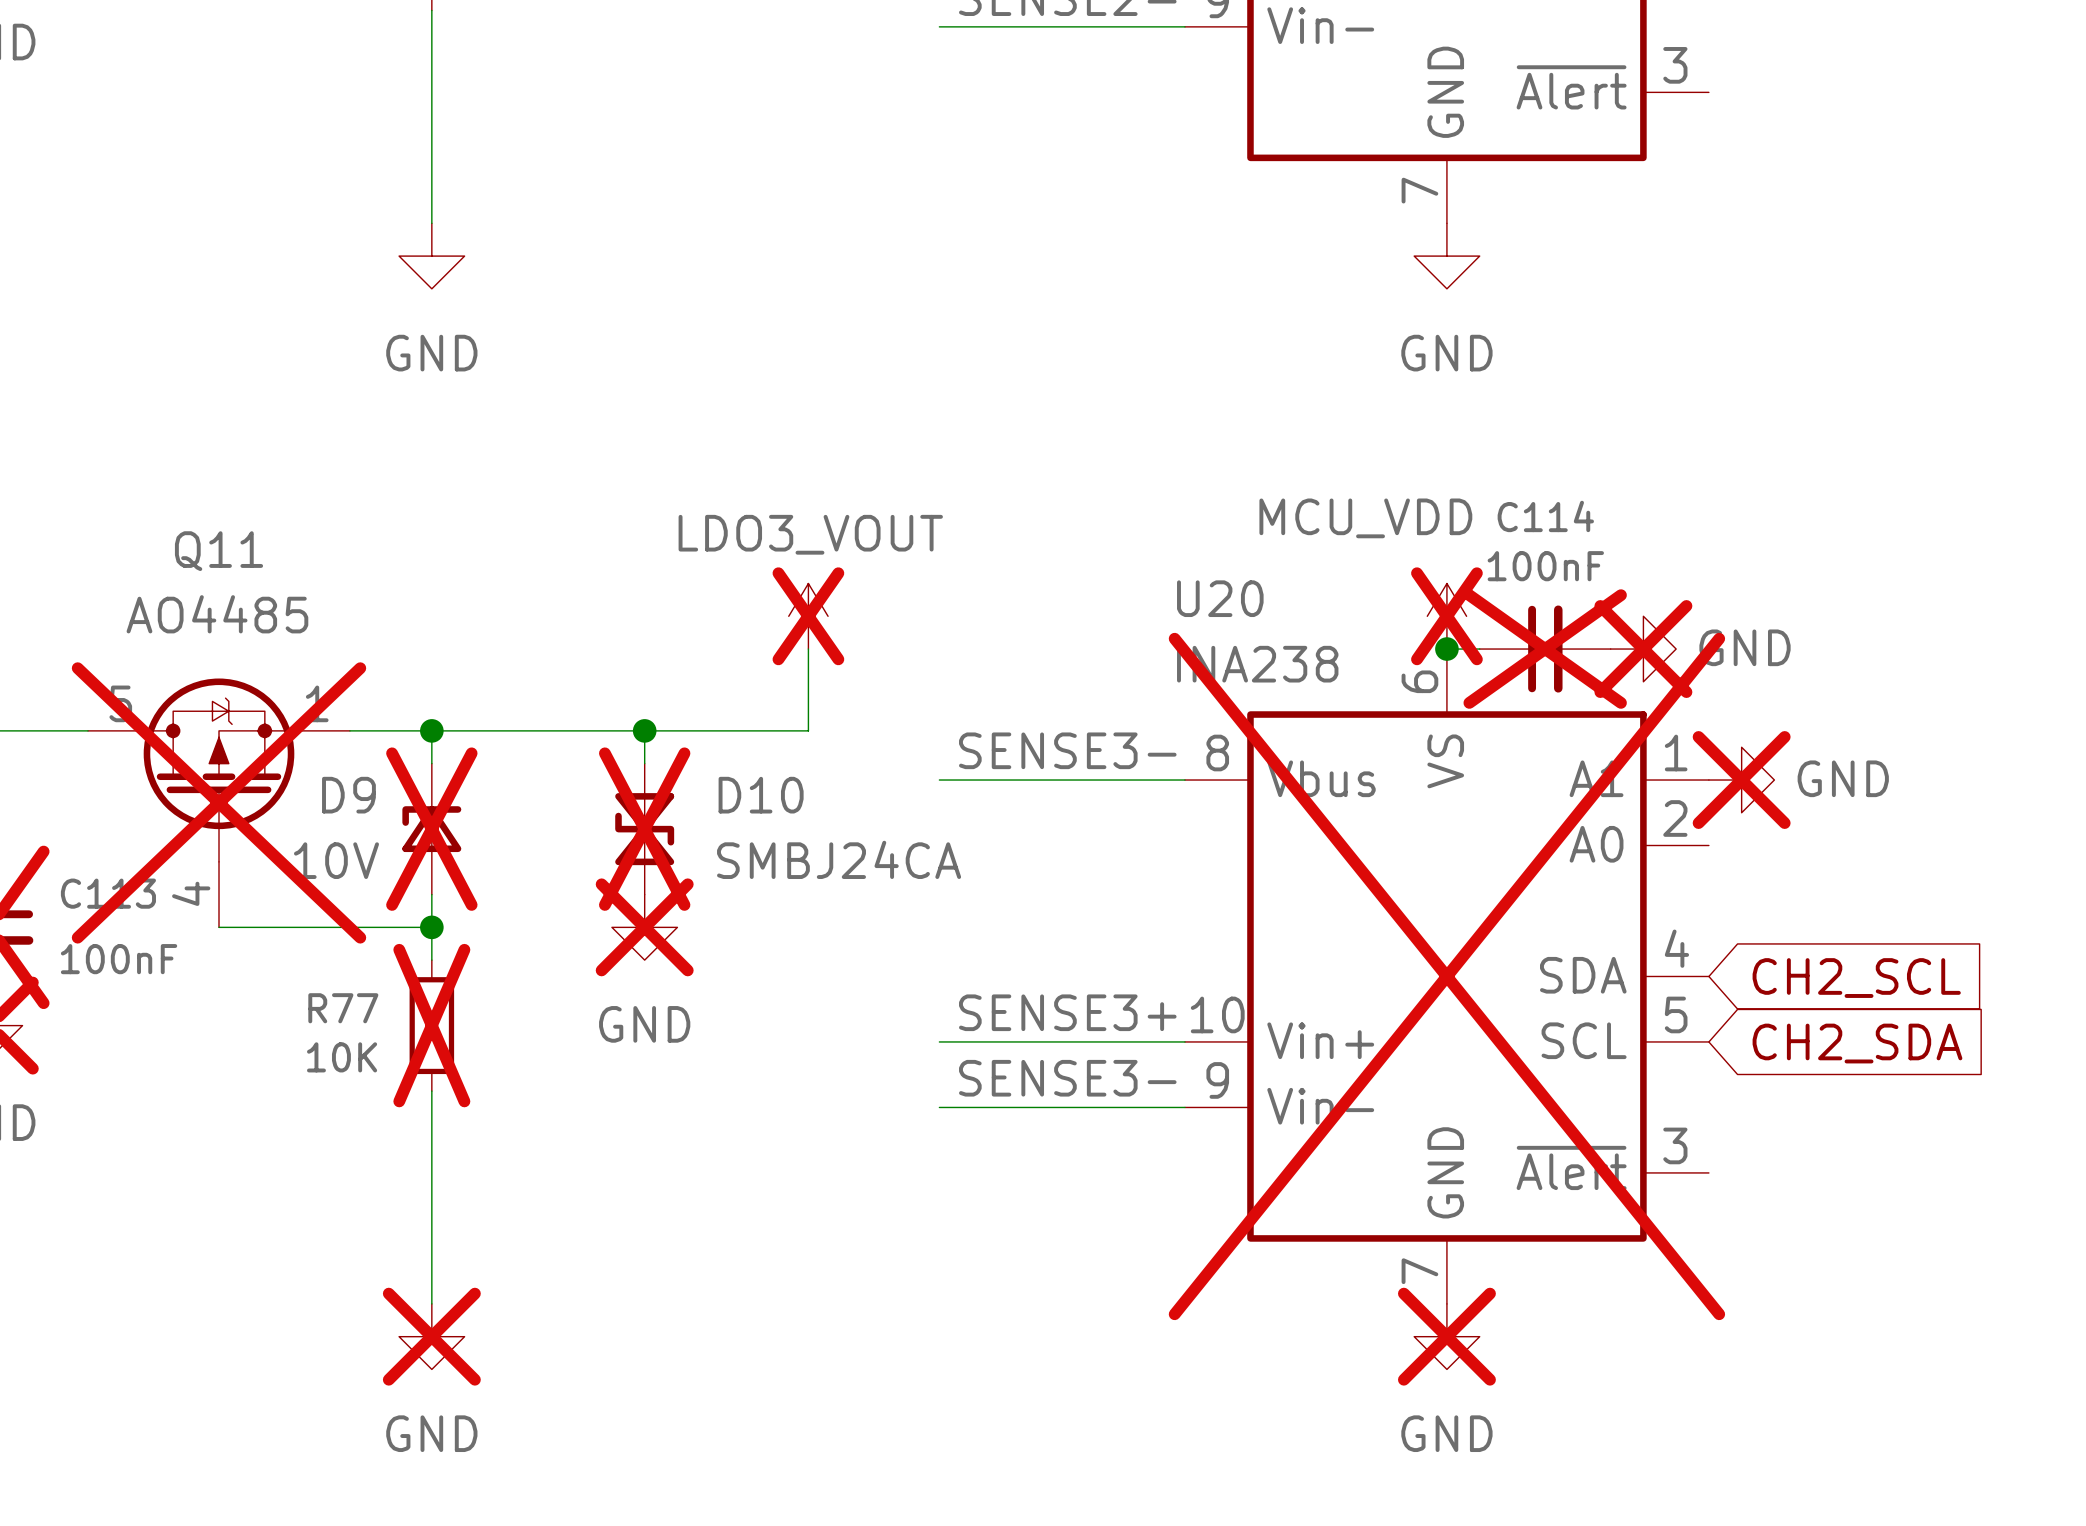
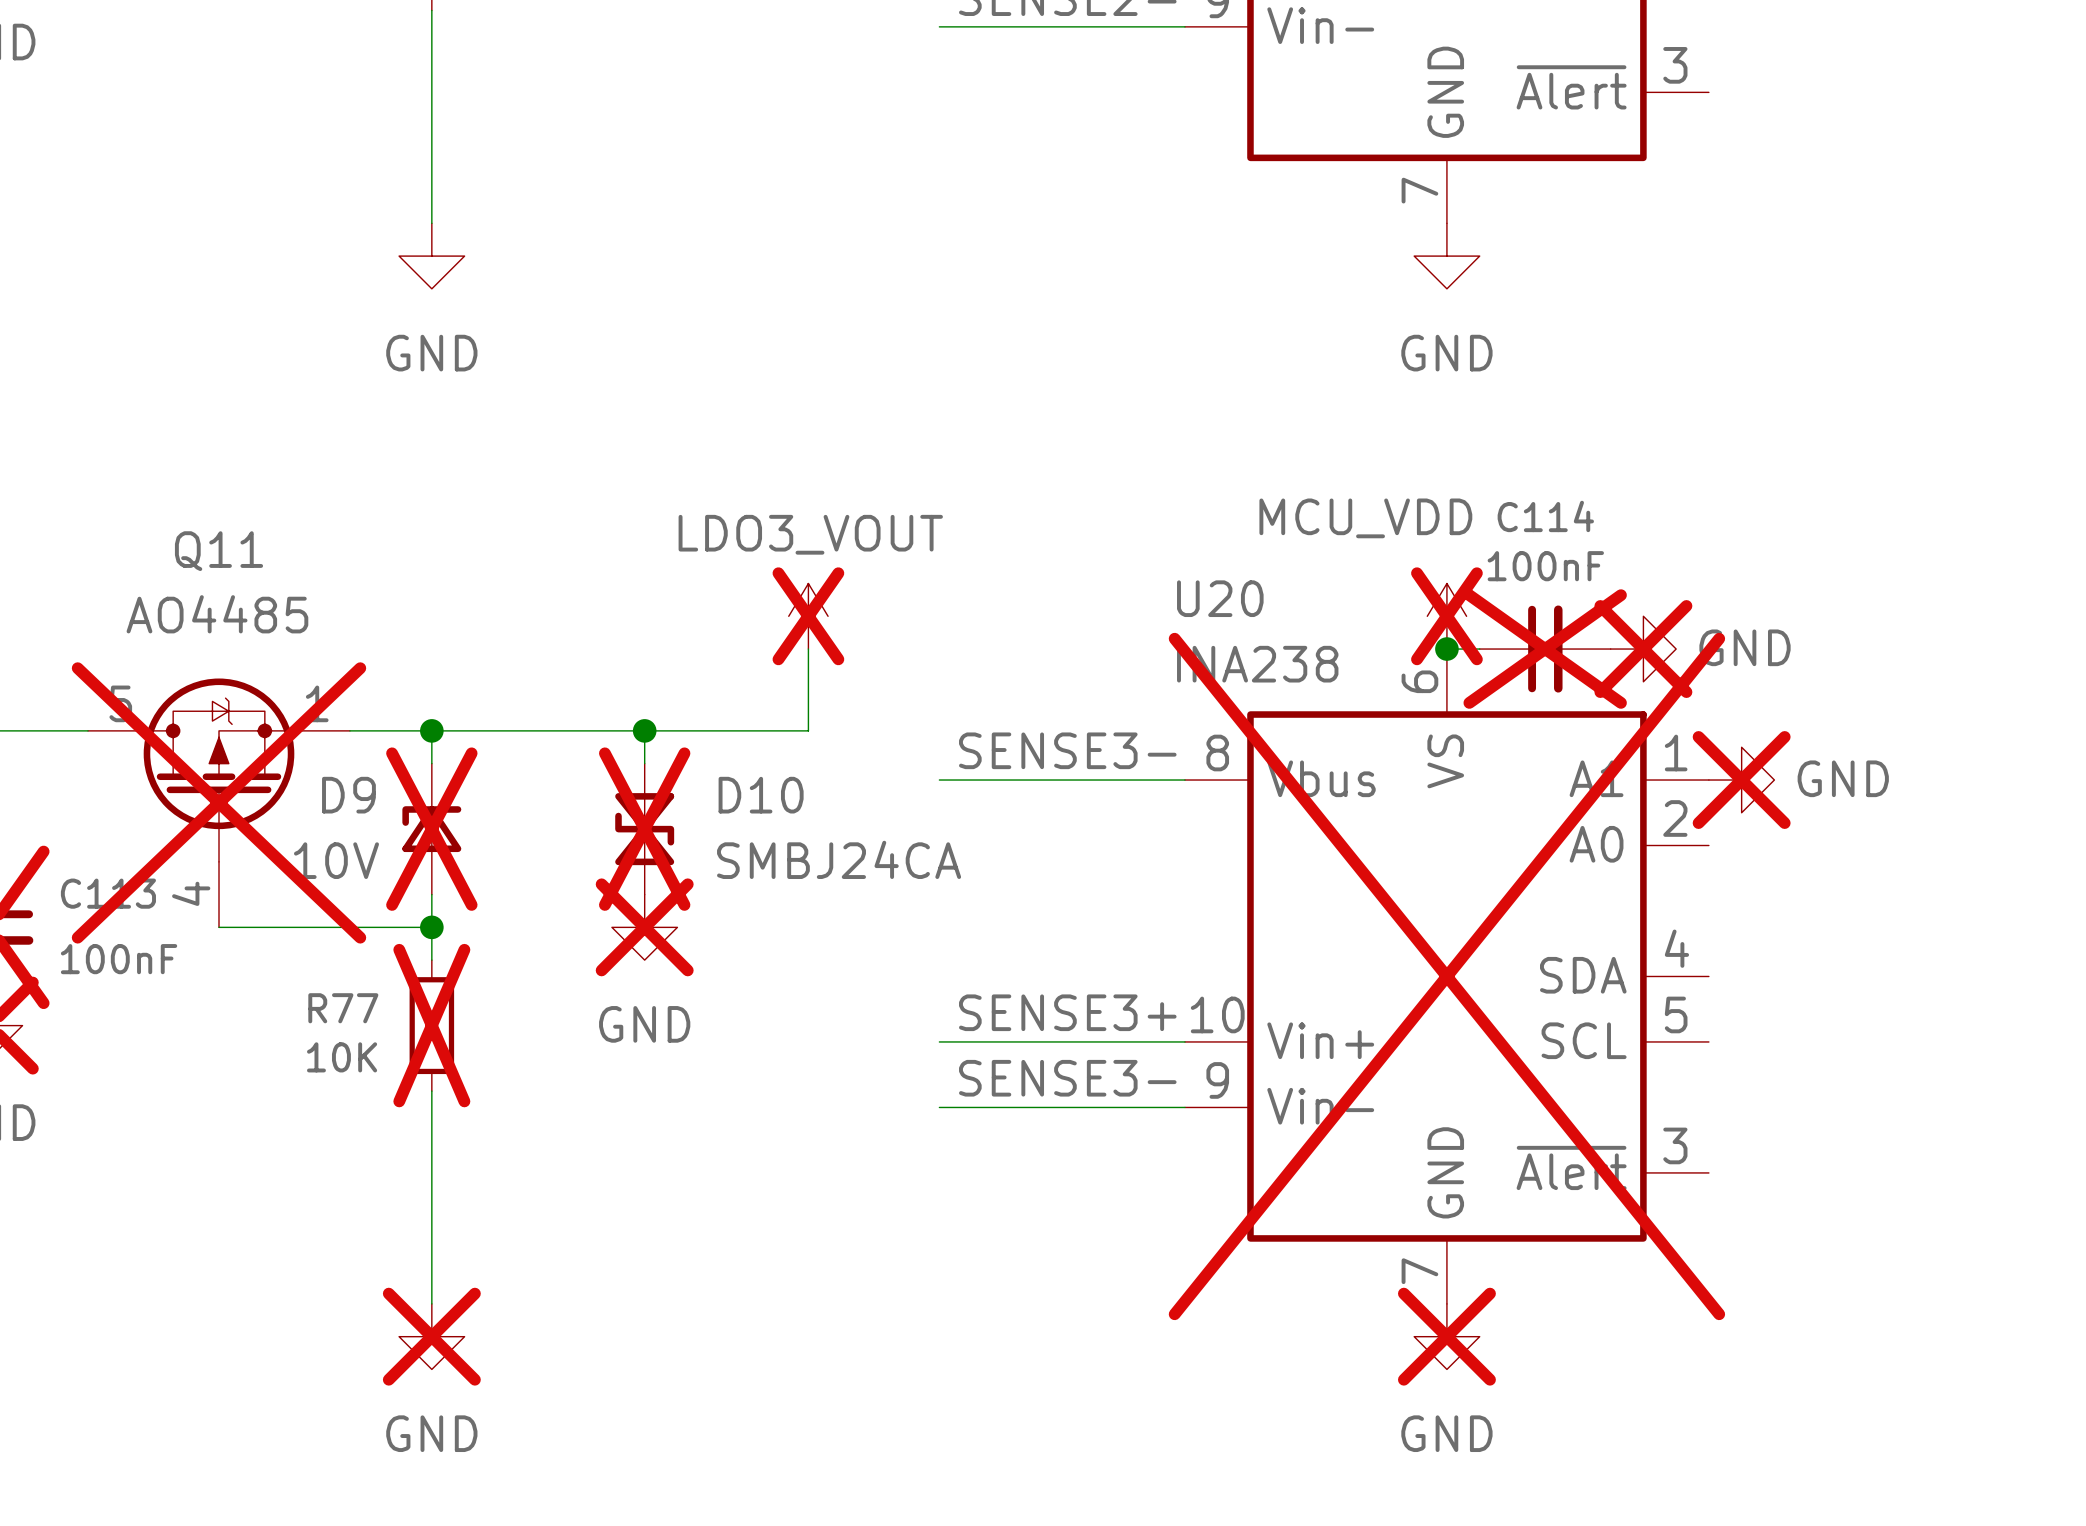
global label: CH2_SCL (1856, 978) -> none
global label: CH2_SDA (1857, 1043) -> none

